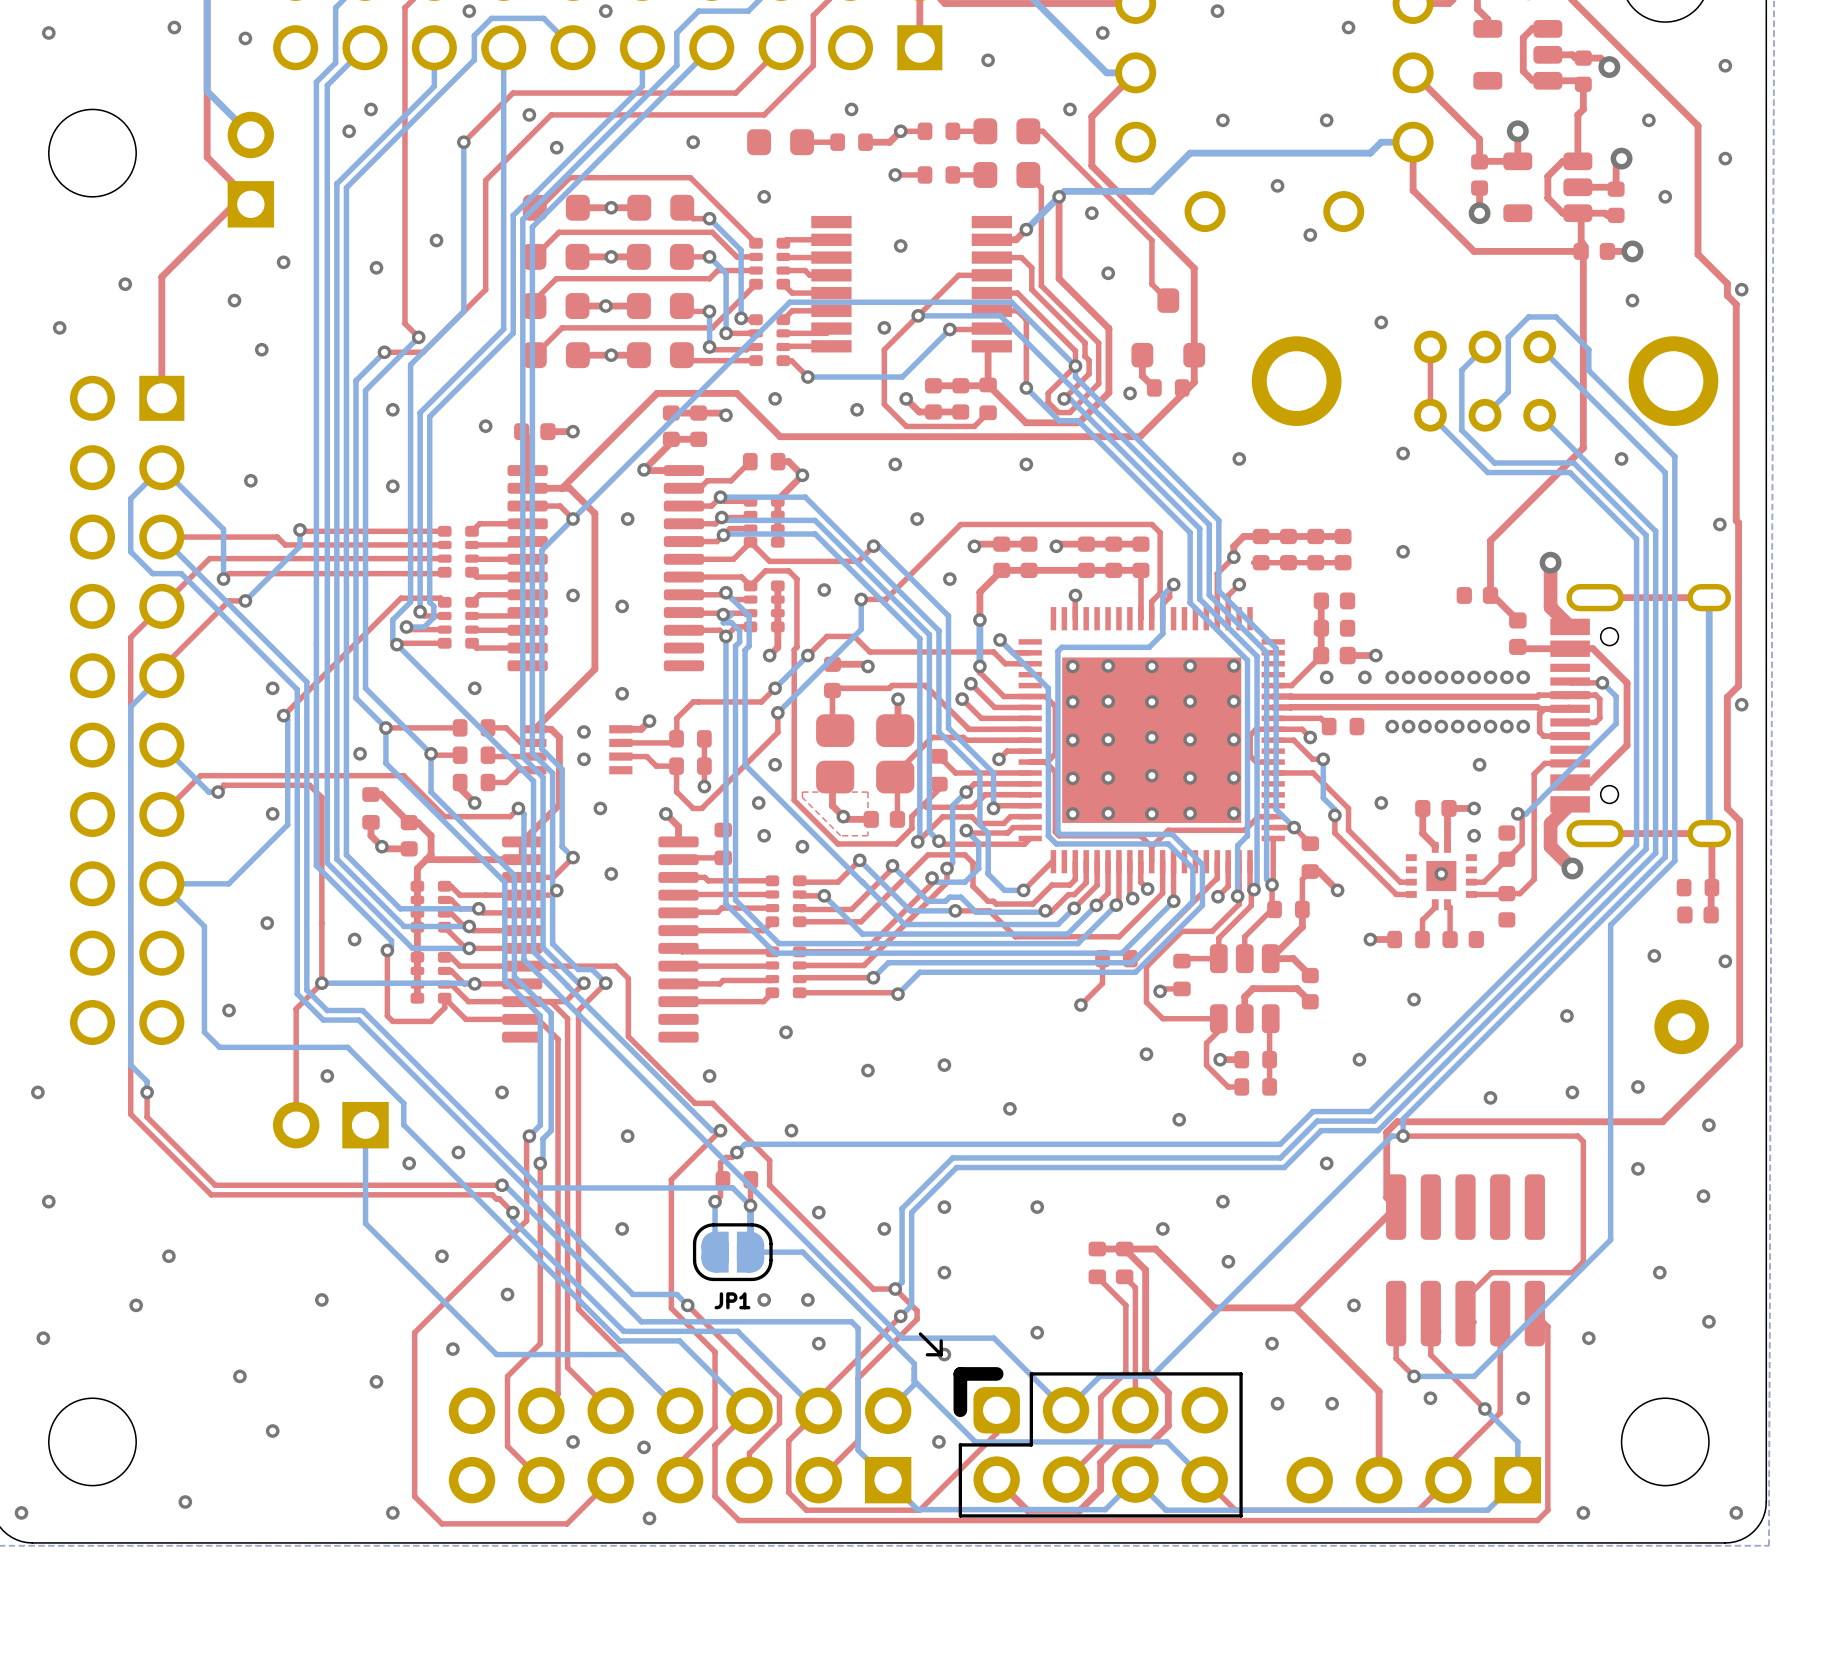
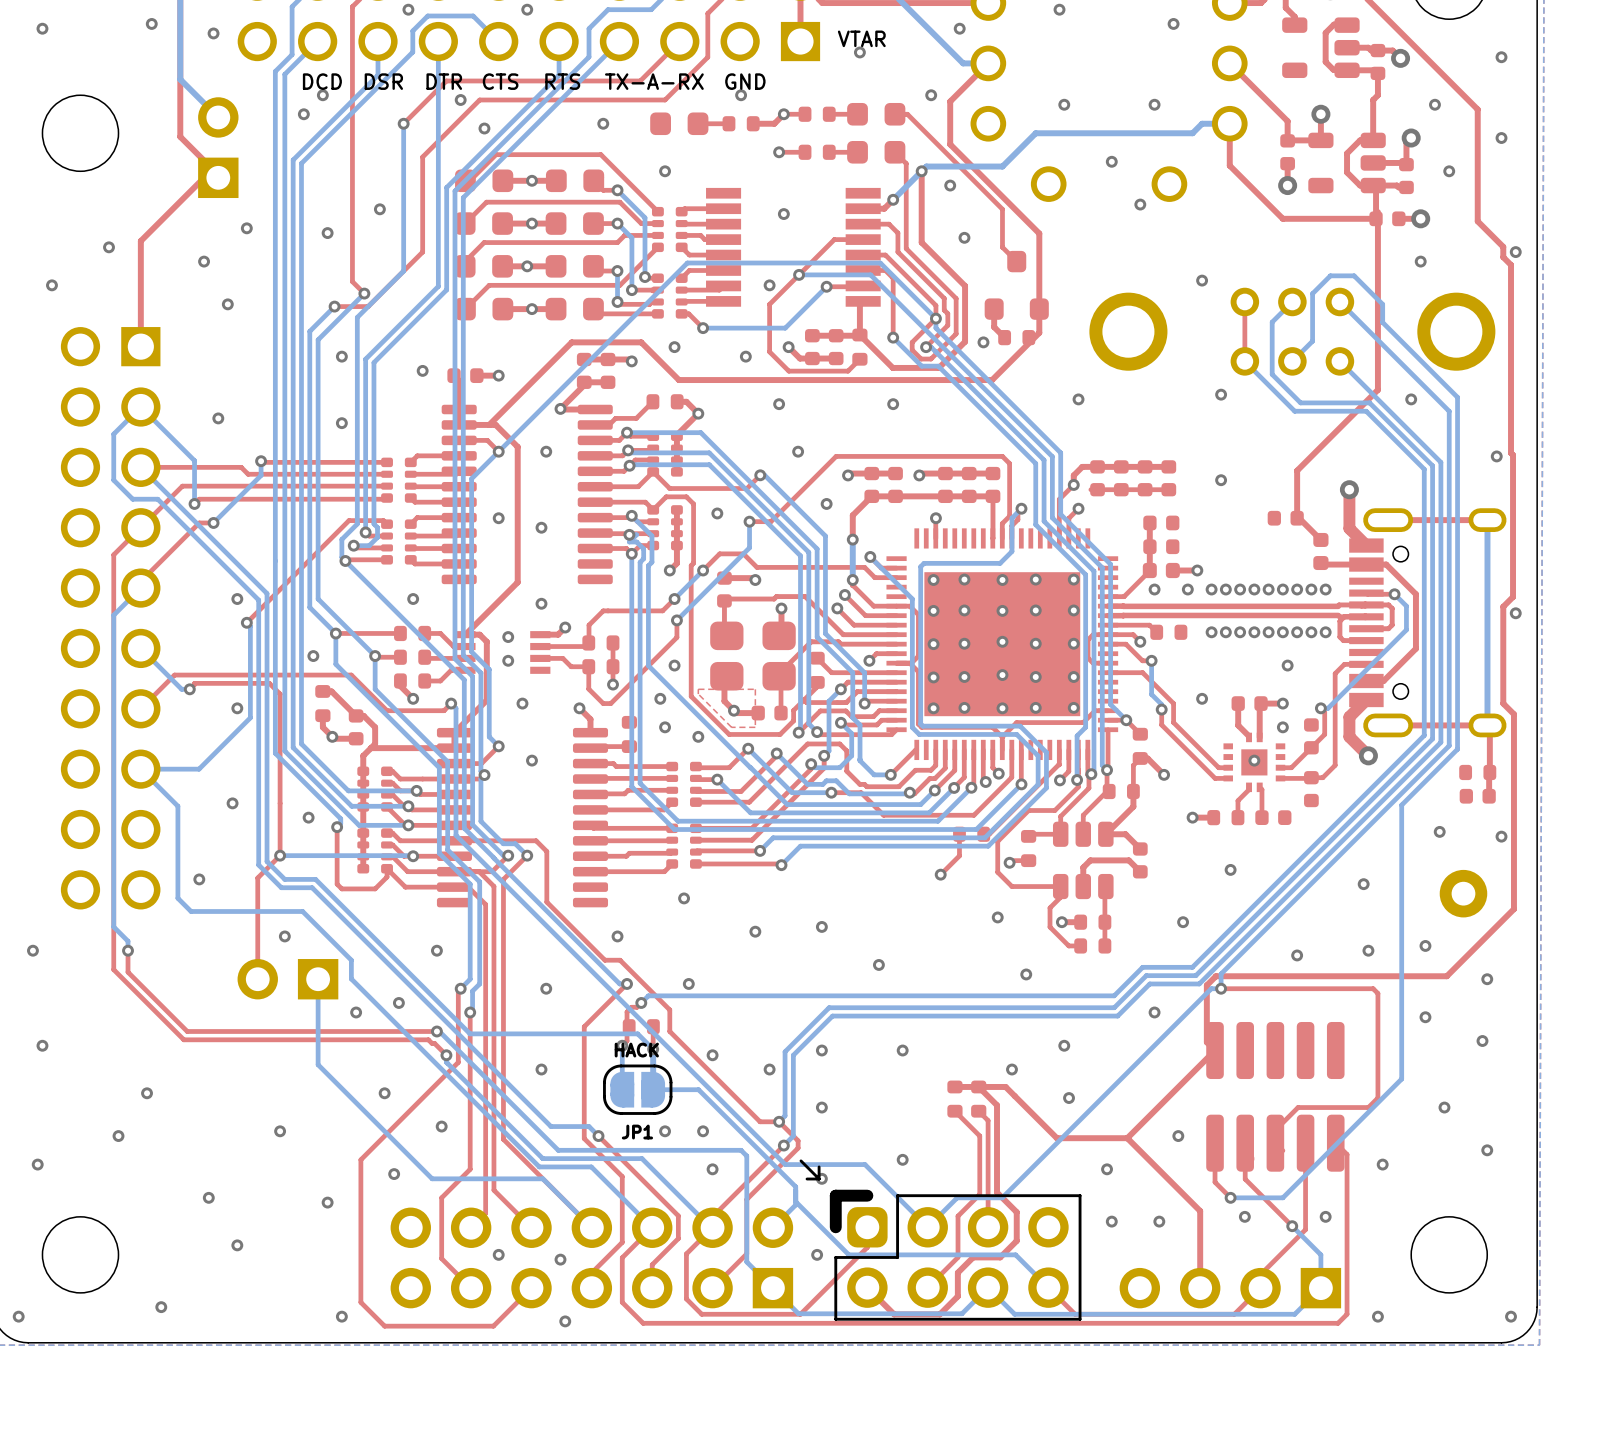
text: none -> VTAR (861, 38)
text: none -> DCD (322, 81)
text: none -> DSR (383, 81)
text: none -> DTR (444, 81)
text: none -> CTS (500, 81)
text: none -> RTS (562, 81)
text: none -> TX-A-RX (654, 81)
text: none -> GND (745, 81)
text: none -> HACK (636, 1050)

